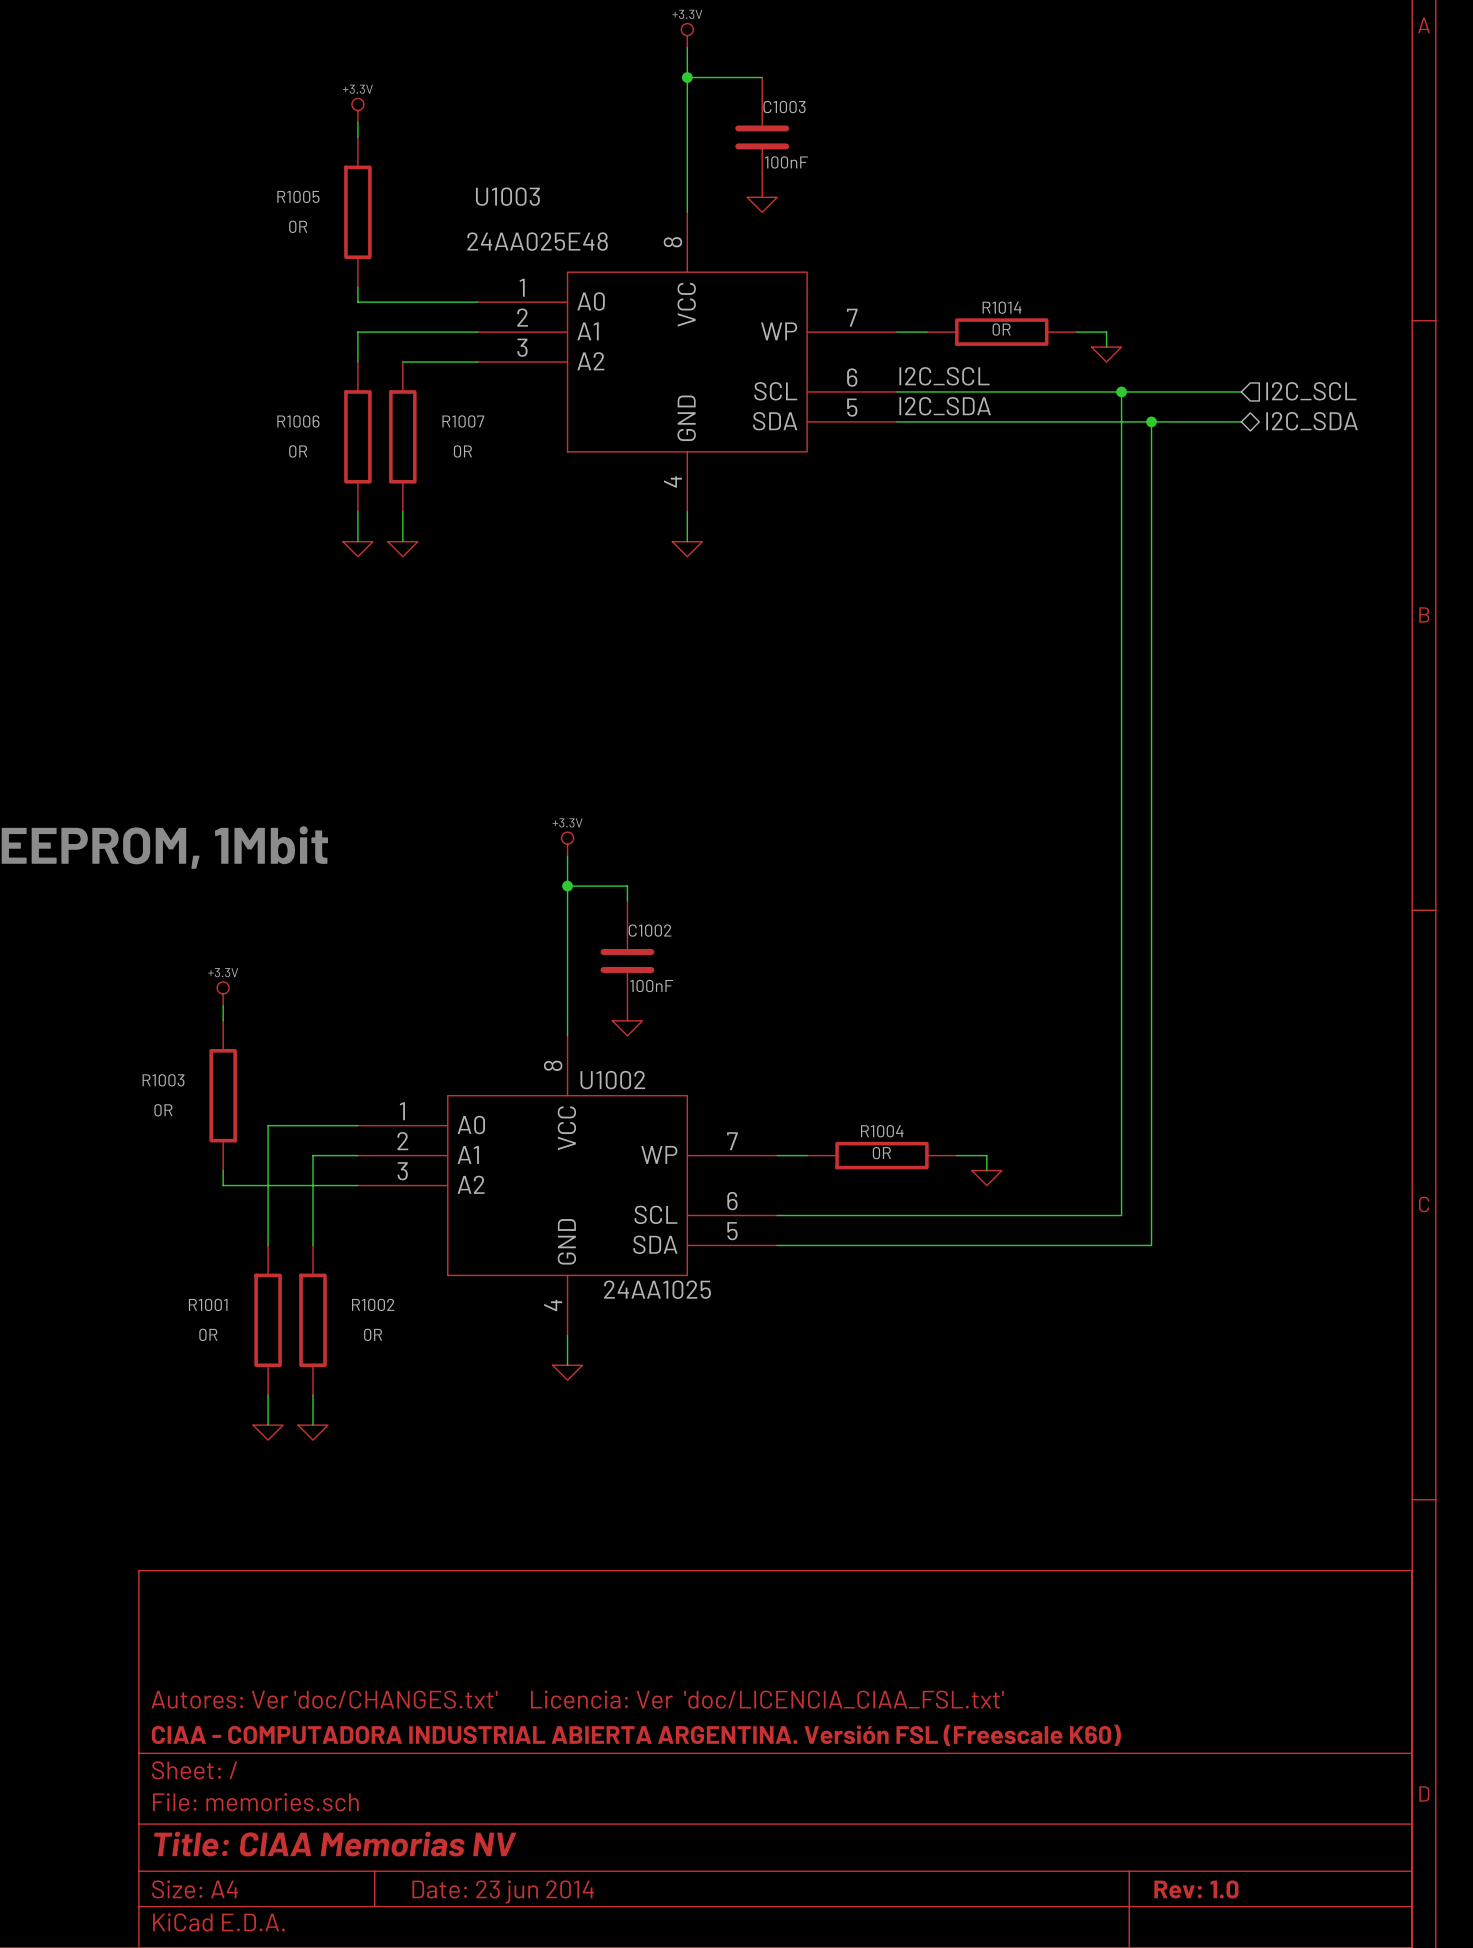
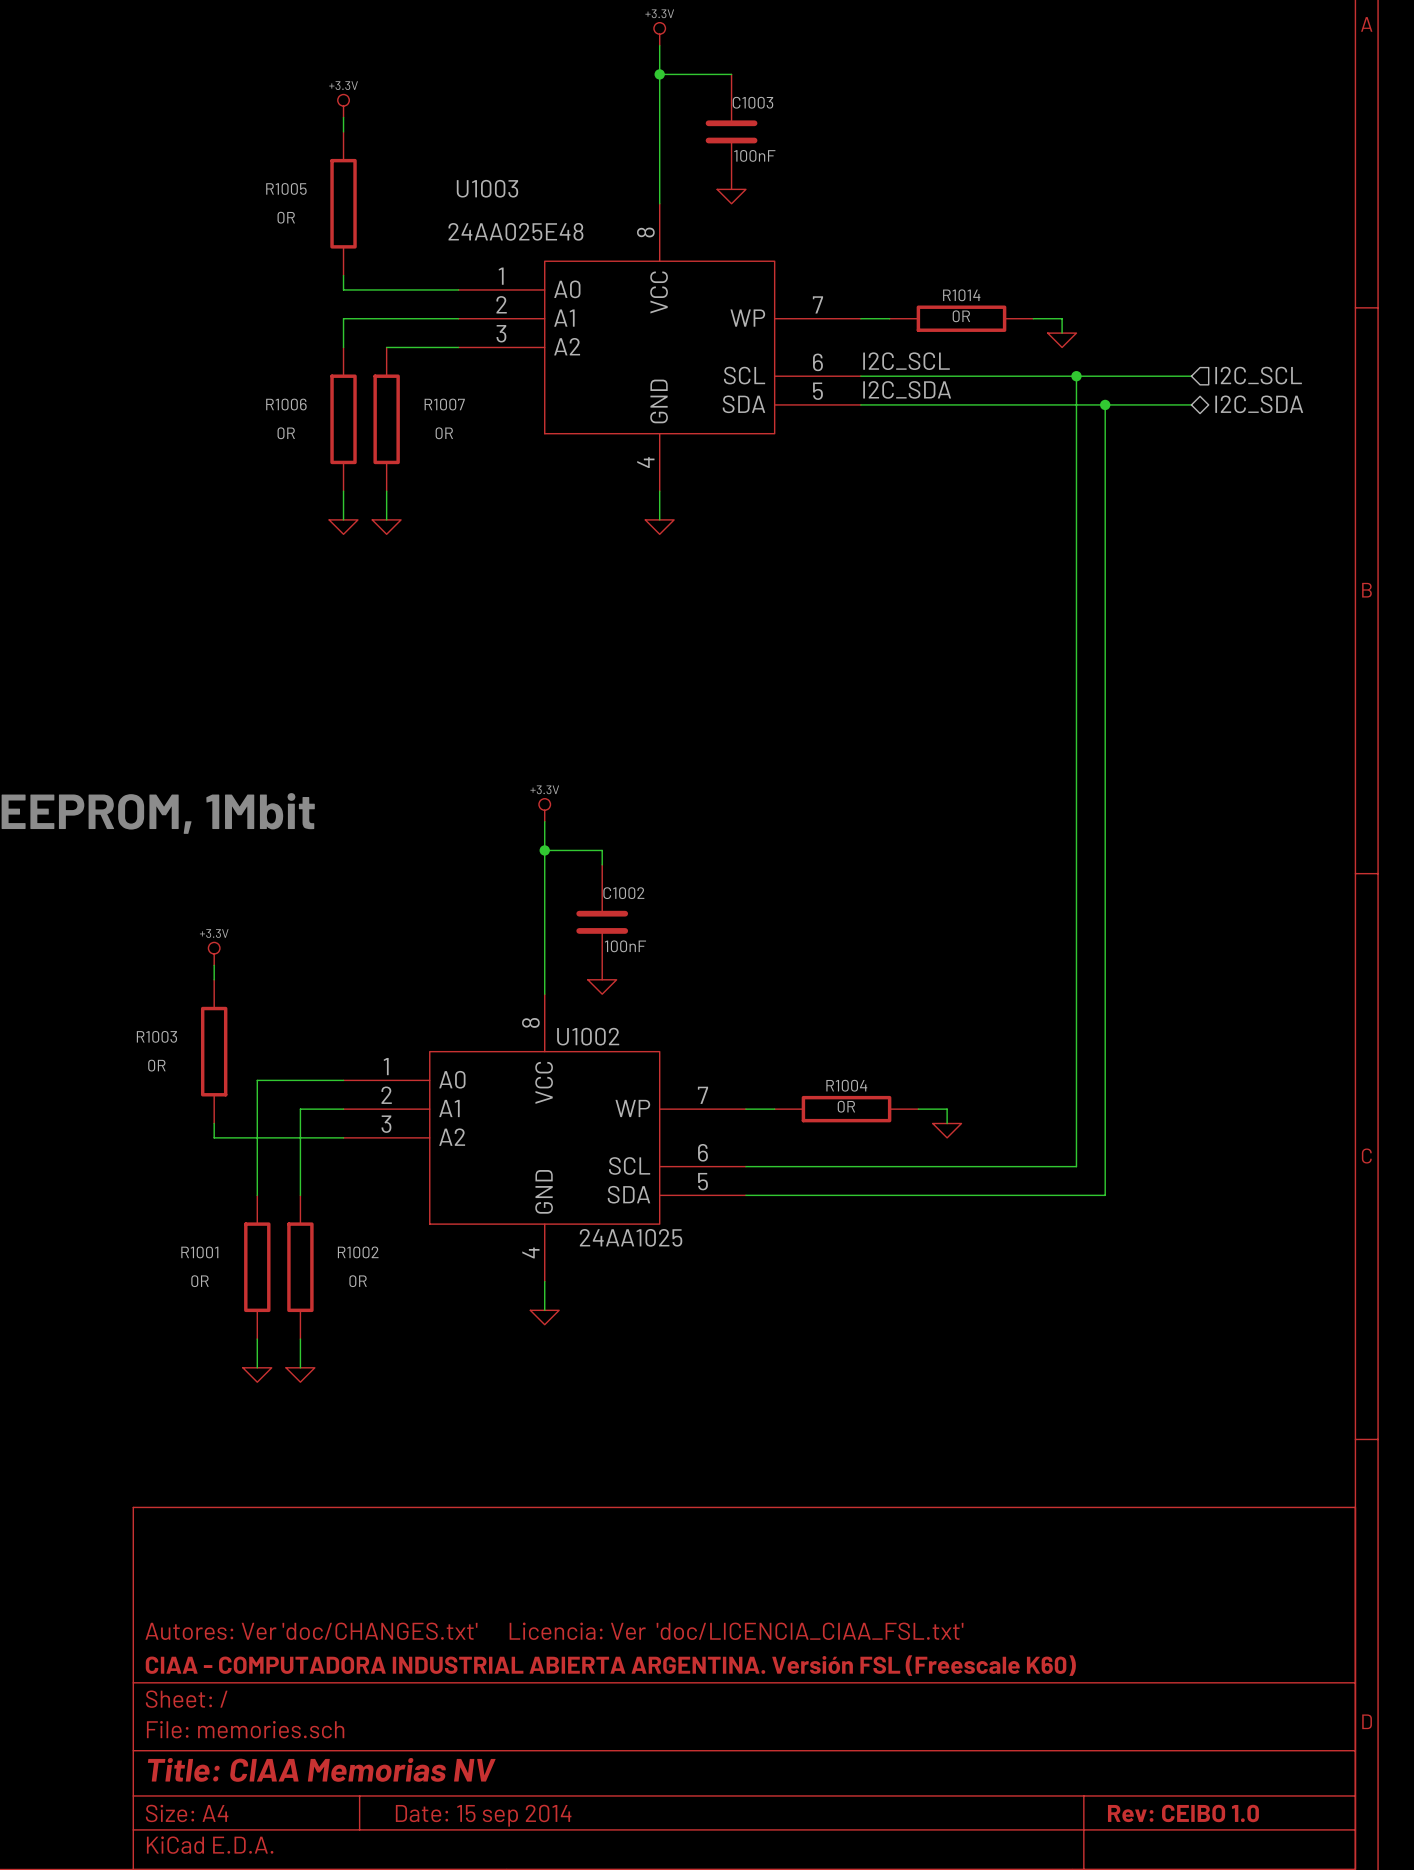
title block: Rev: 1.0 (1196, 1889) -> Rev: CEIBO 1.0 (1183, 1813)
title block: Date: 23 jun 2014 (503, 1891) -> Date: 15 sep 2014 (483, 1815)

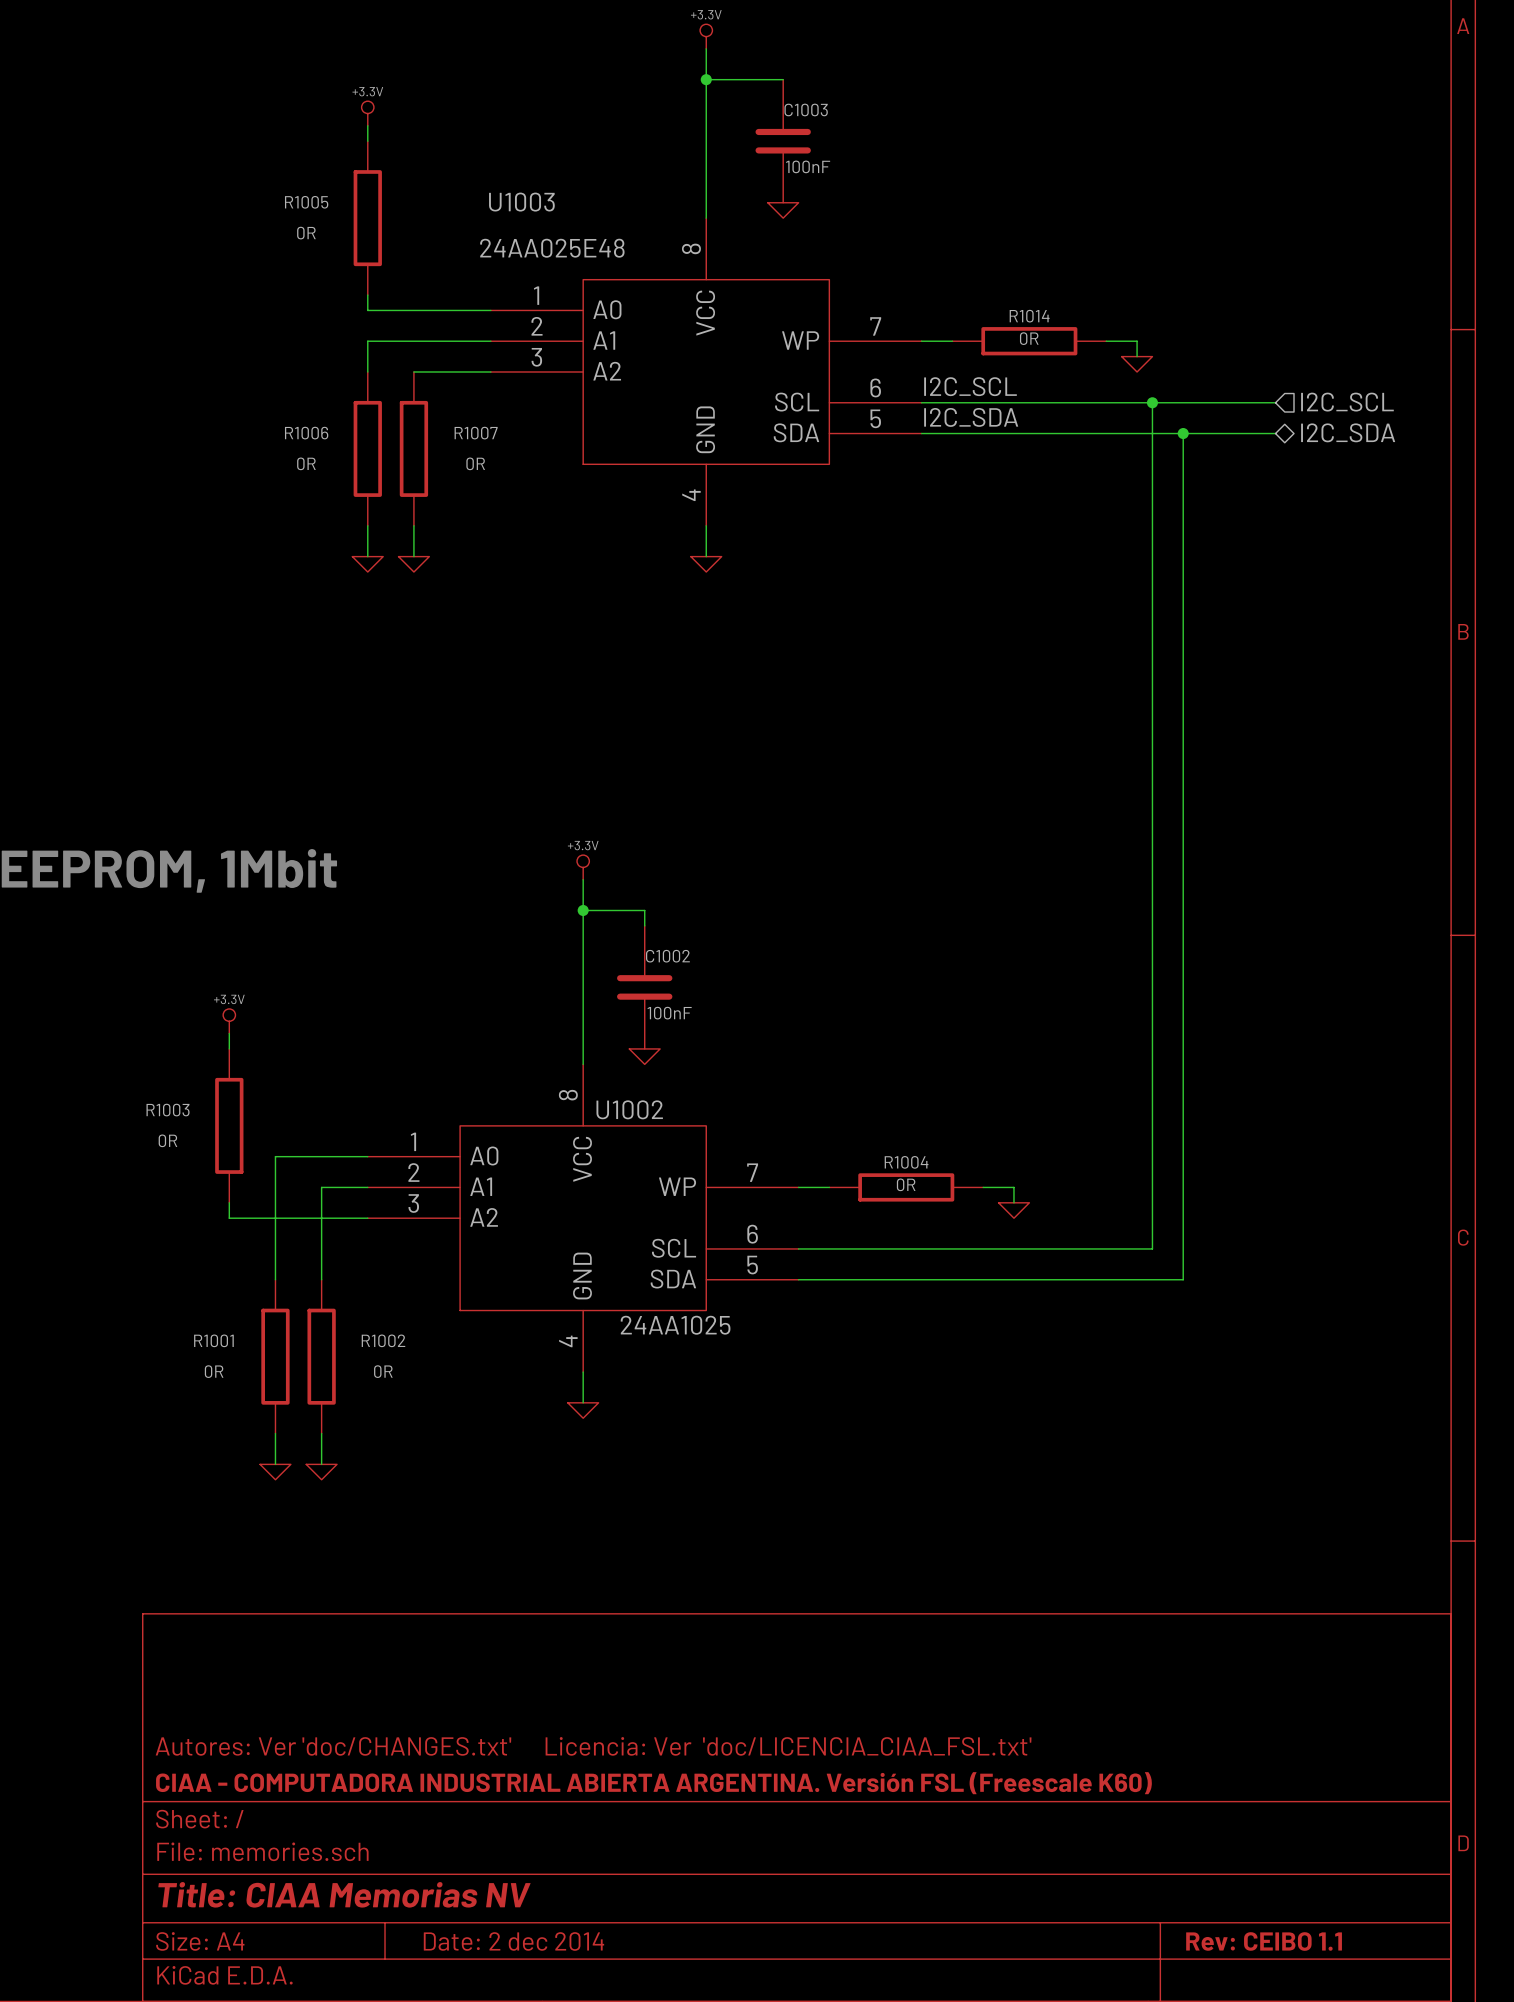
title block: Rev: CEIBO 1.0 (1183, 1813) -> Rev: CEIBO 1.1 (1264, 1941)
title block: Date: 15 sep 2014 (483, 1815) -> Date: 2 dec 2014 (513, 1941)

